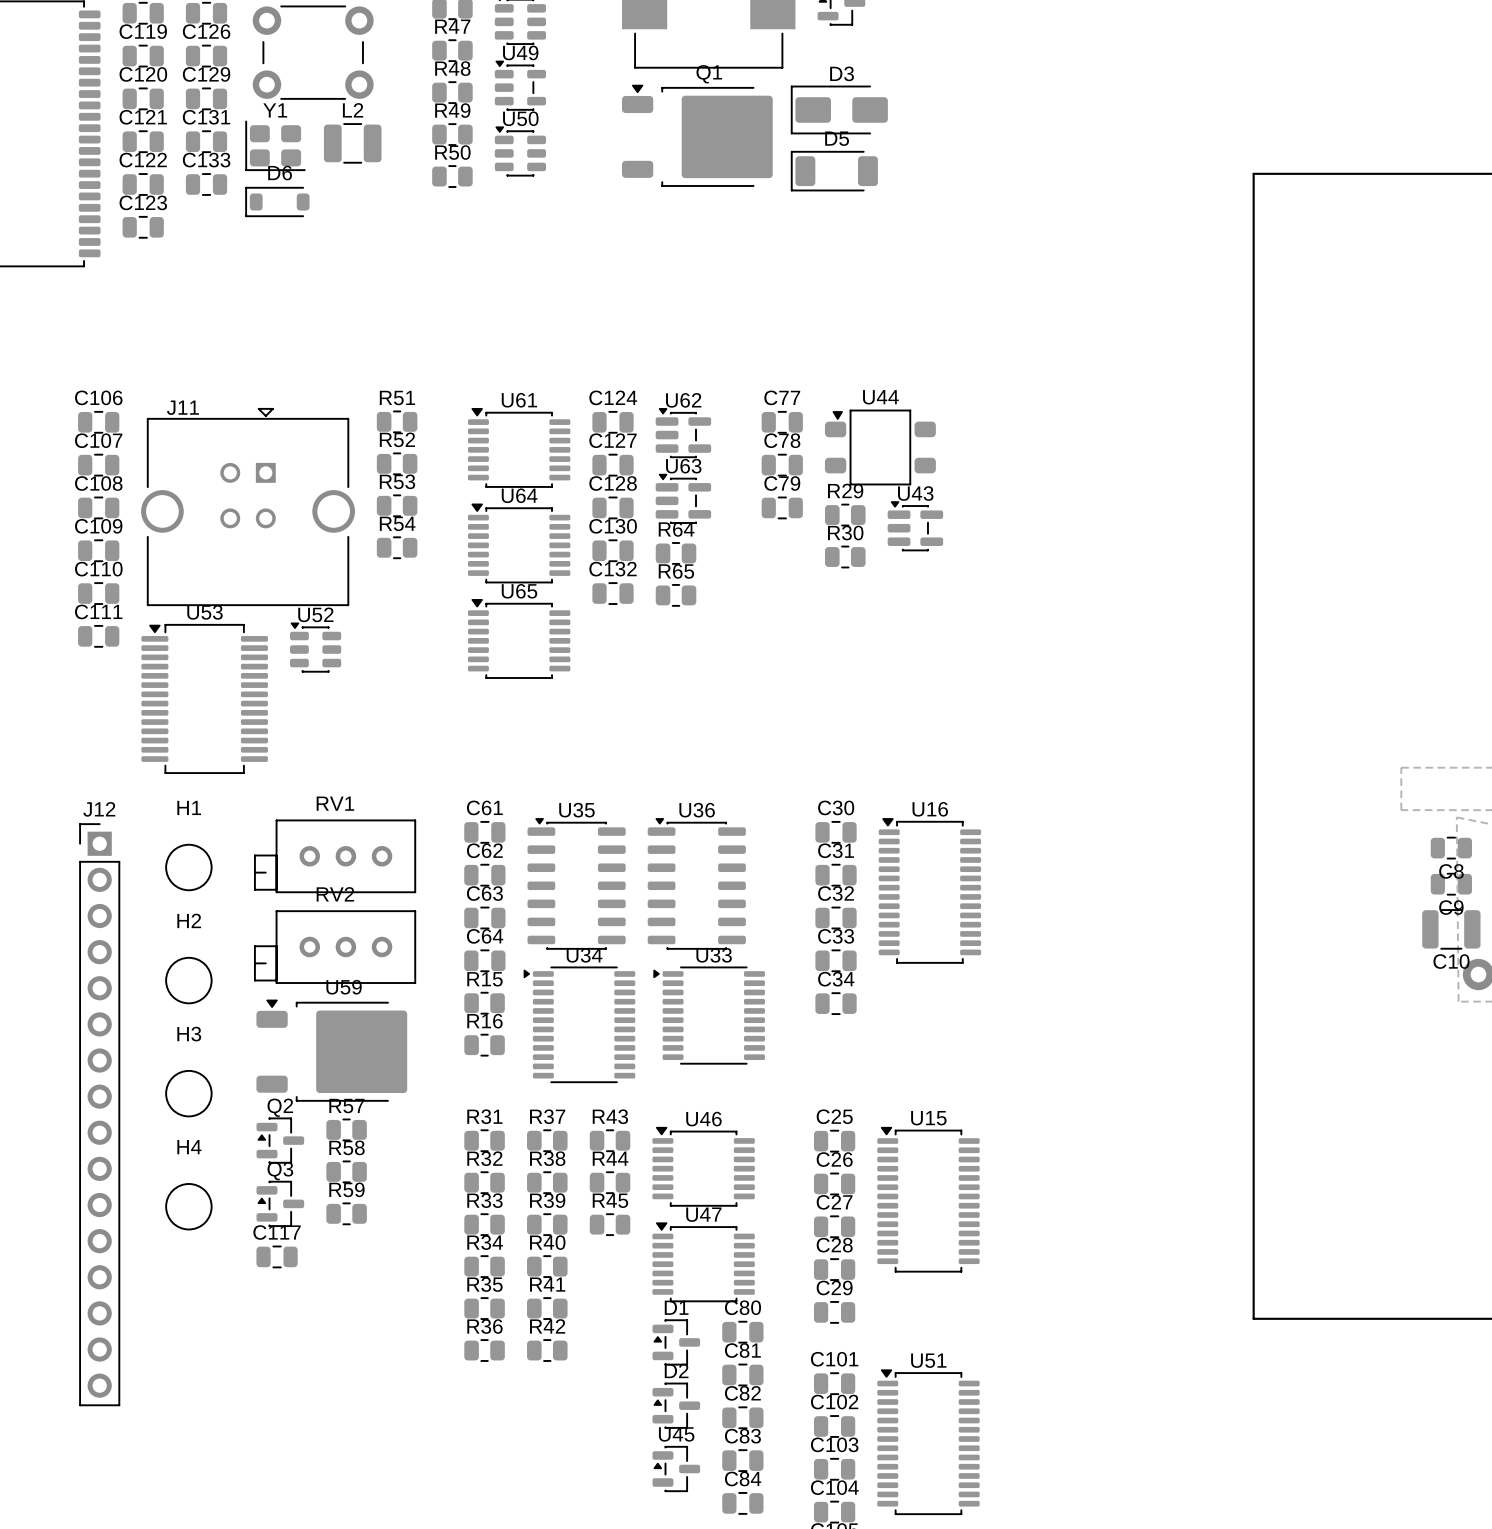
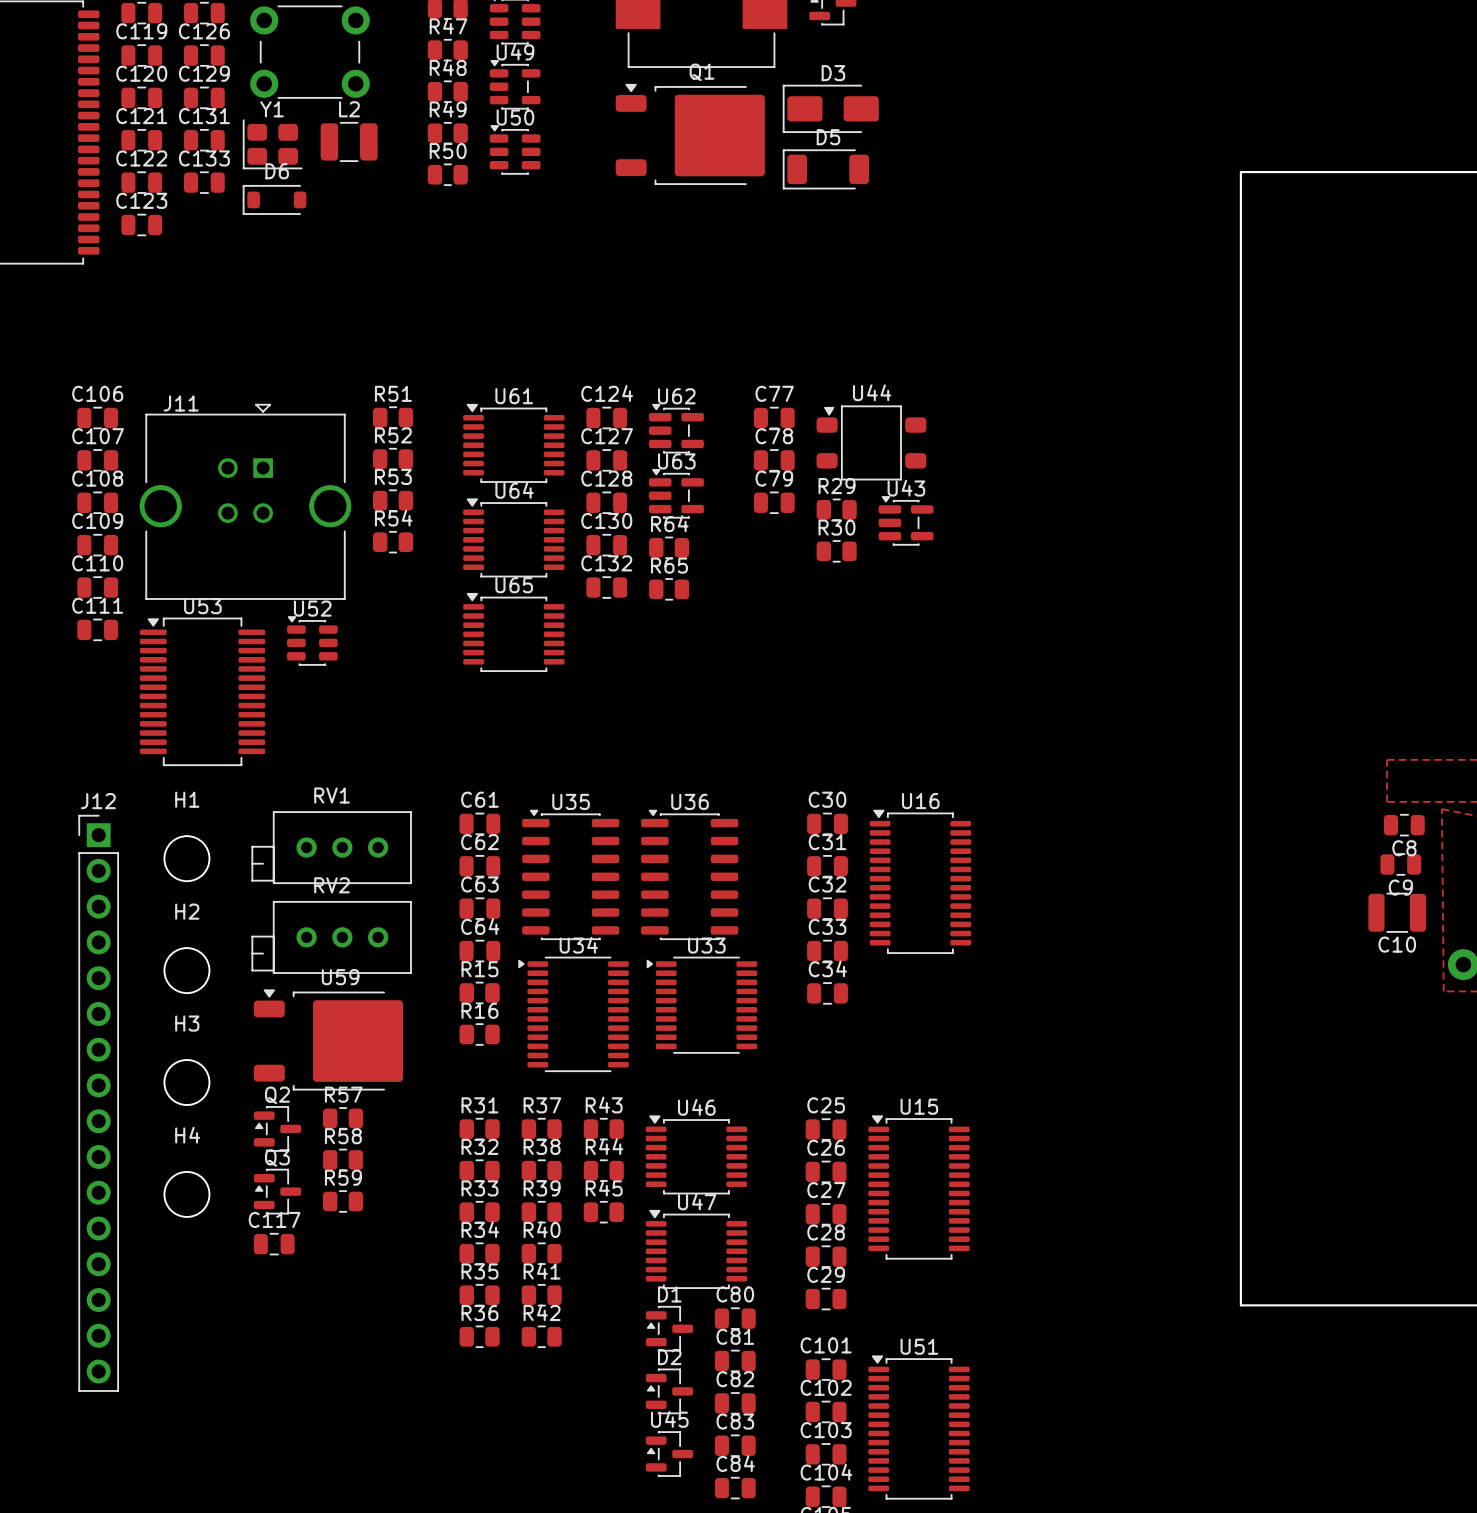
C8 position: (1451, 848) -> (1404, 825)
C9 position: (1451, 884) -> (1400, 864)
C10 position: (1451, 929) -> (1397, 912)

